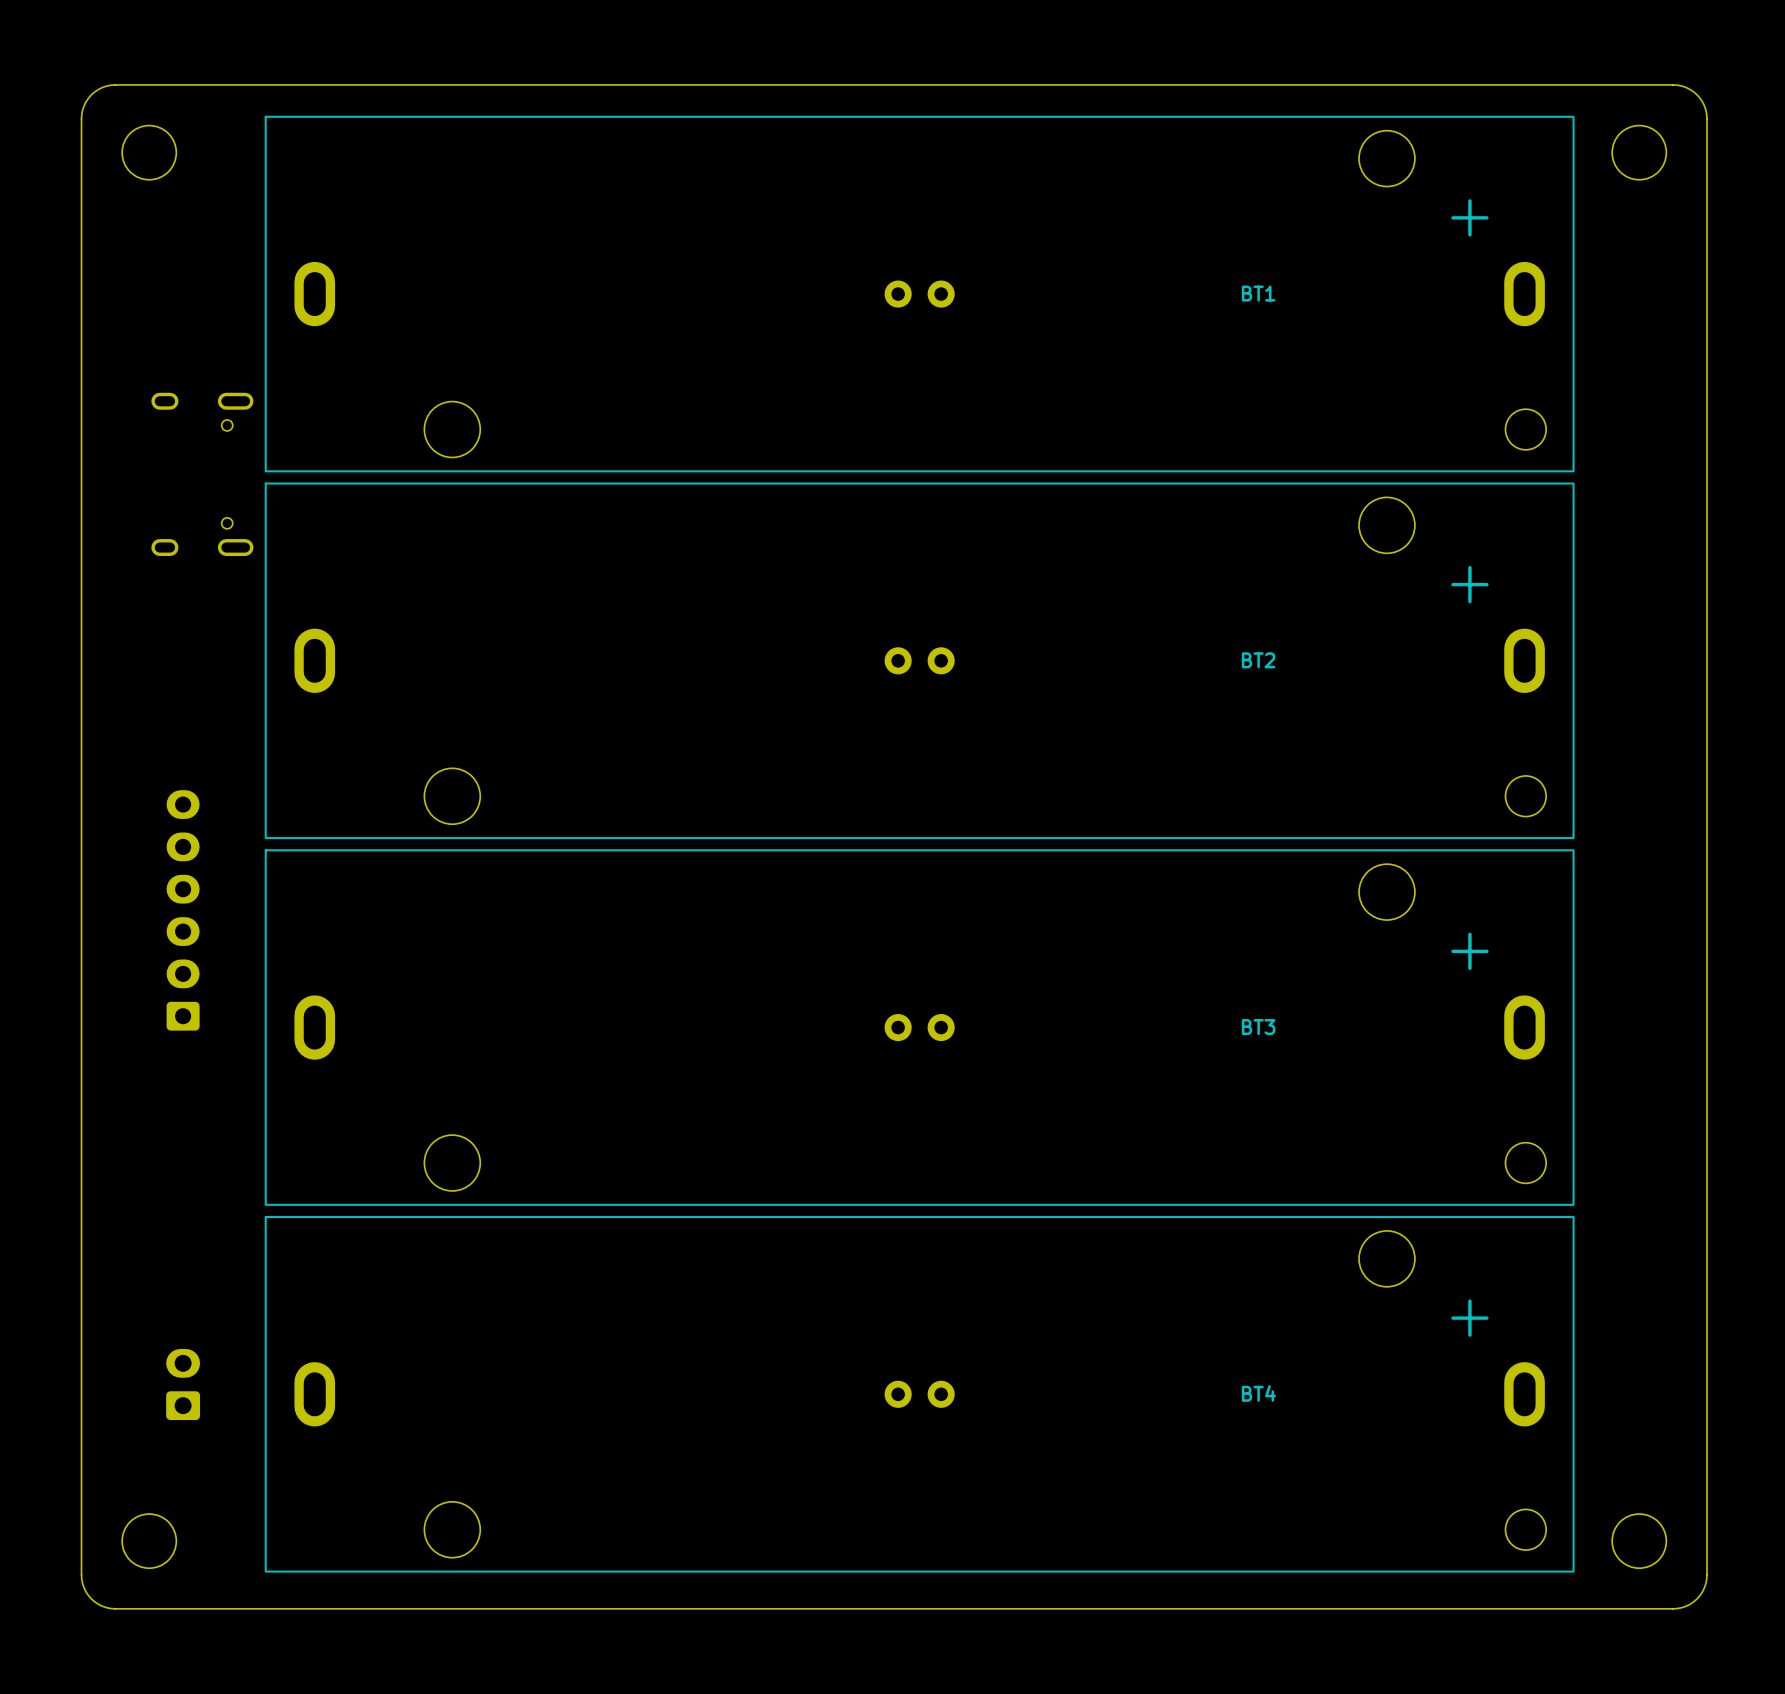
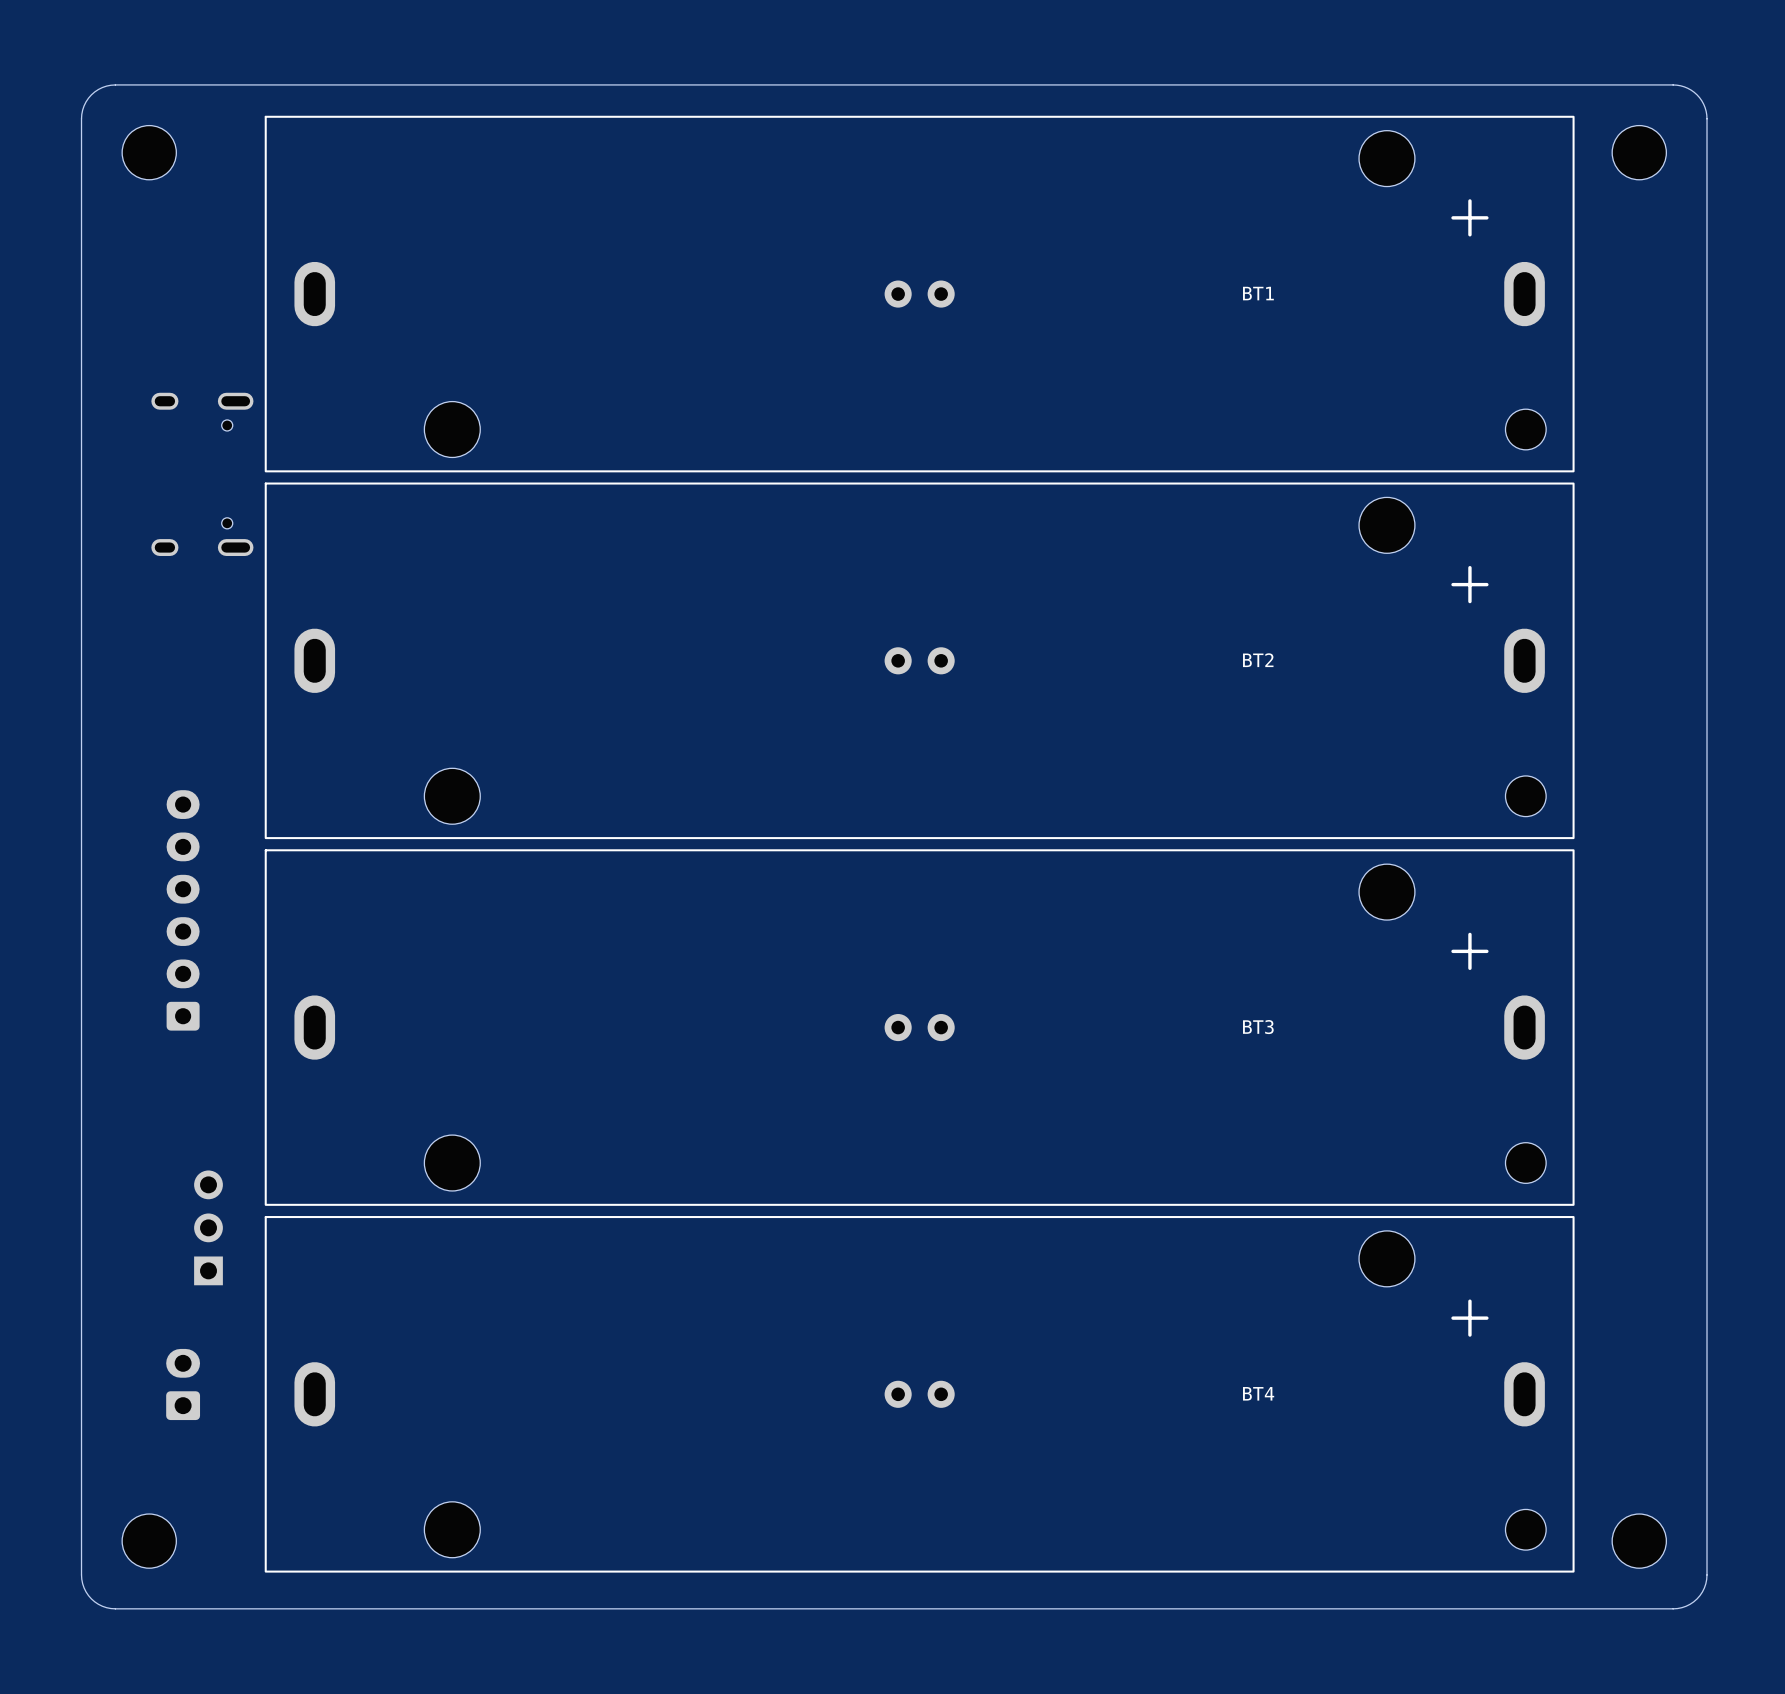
part: none -> (208, 1227)

